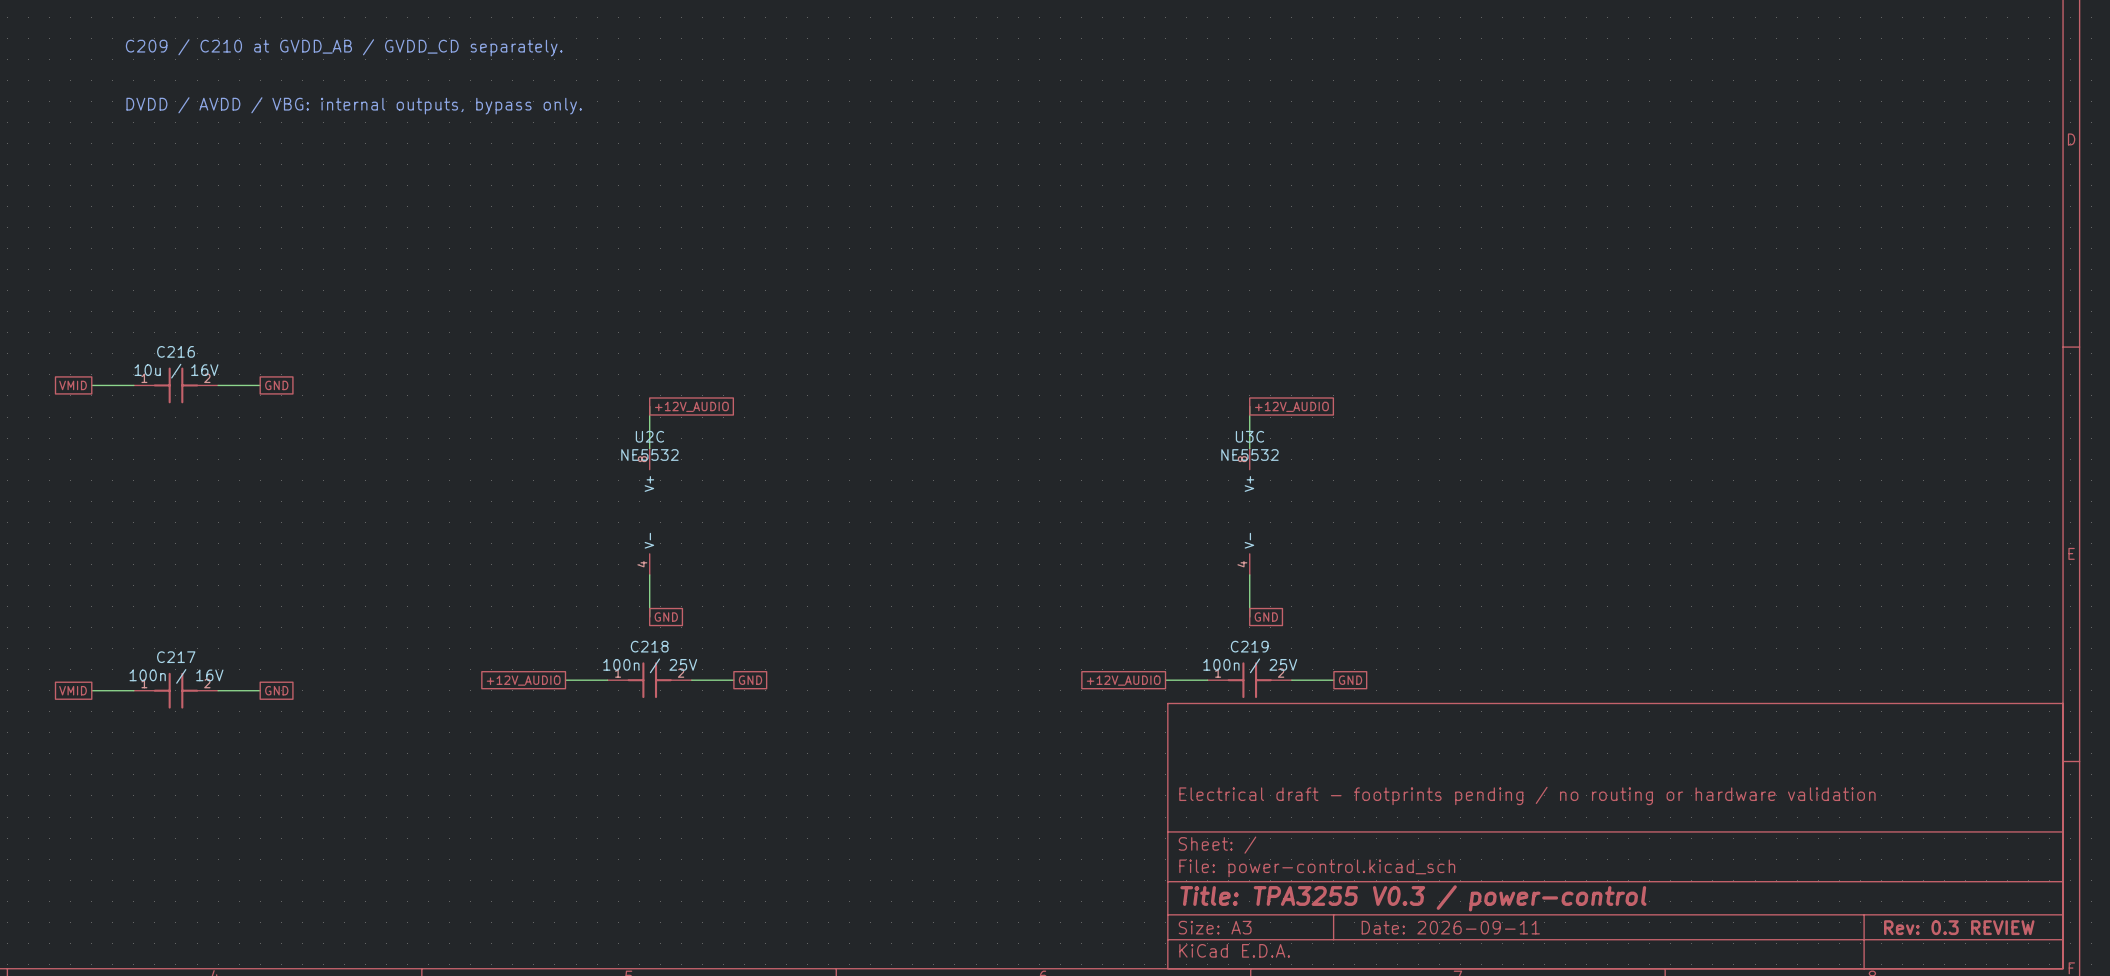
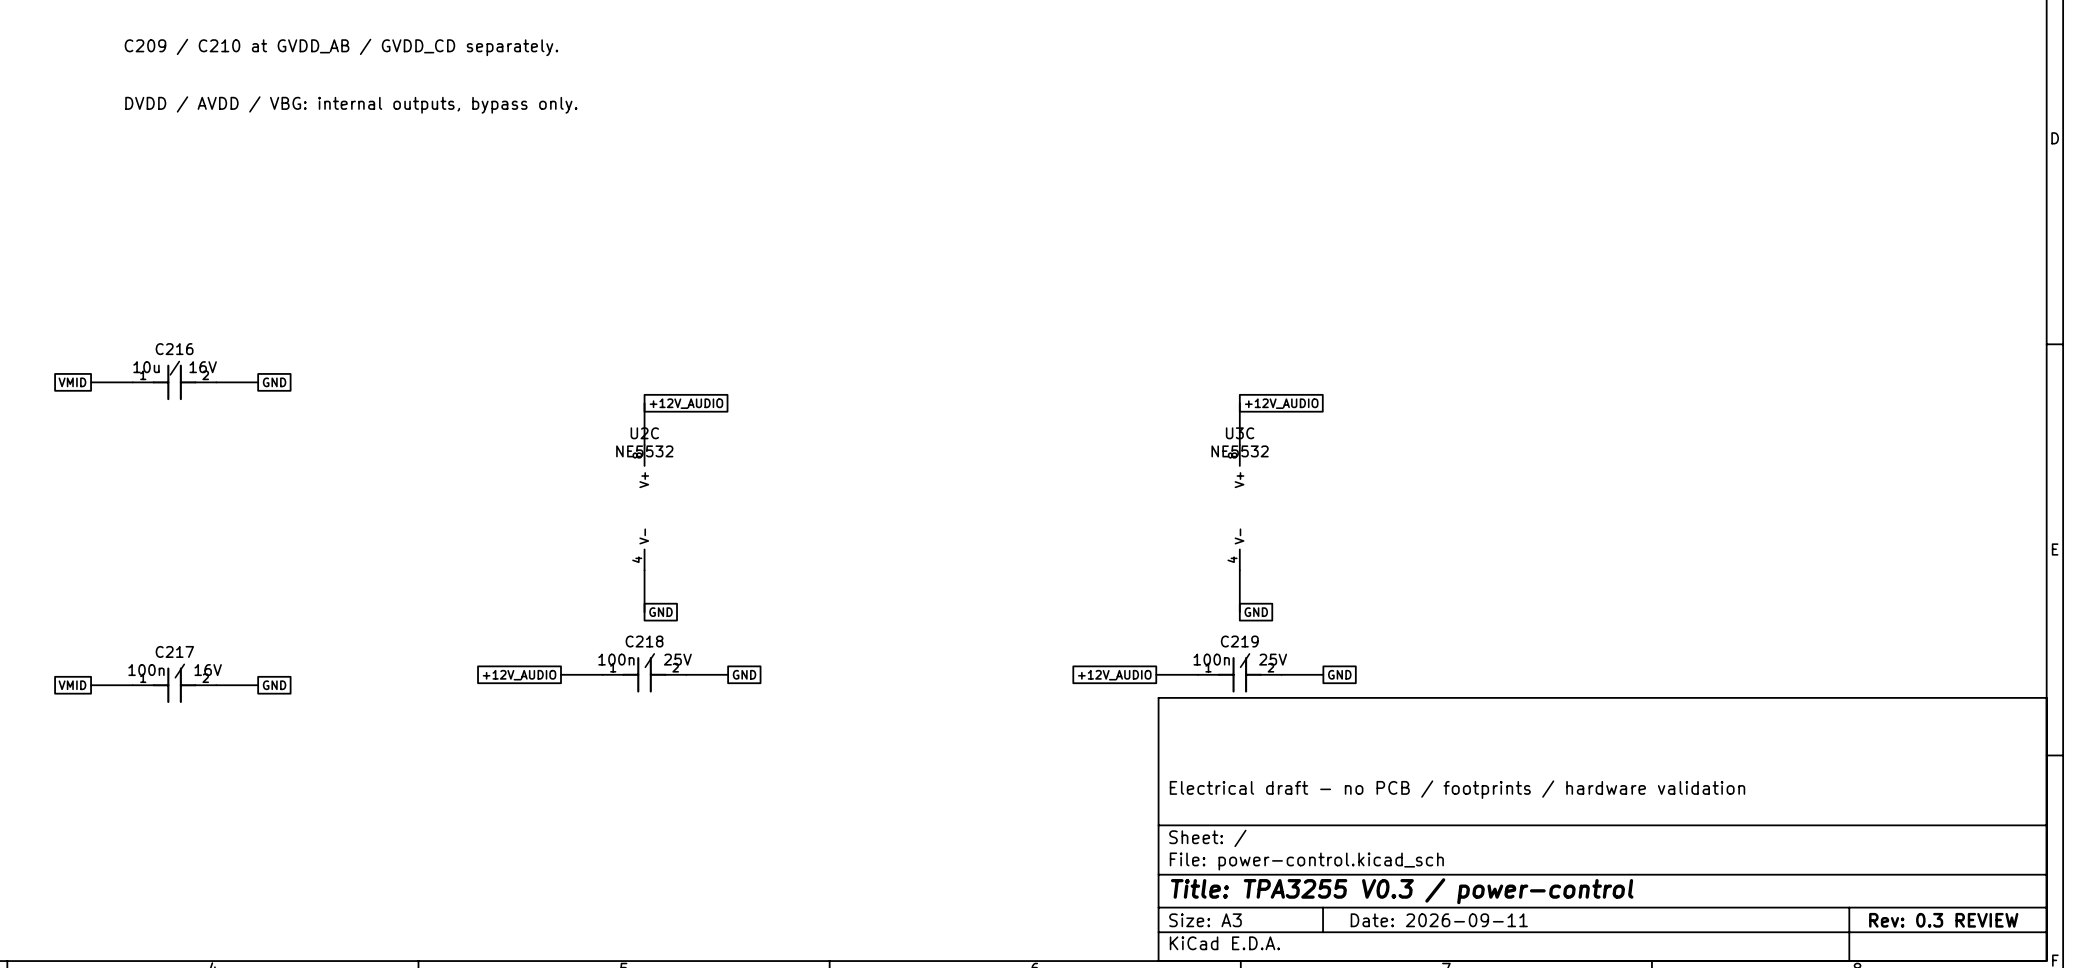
title block: Electrical draft - footprints pending / no routing or hardware validation (1527, 795) -> Electrical draft - no PCB / footprints / hardware validation (1457, 789)

